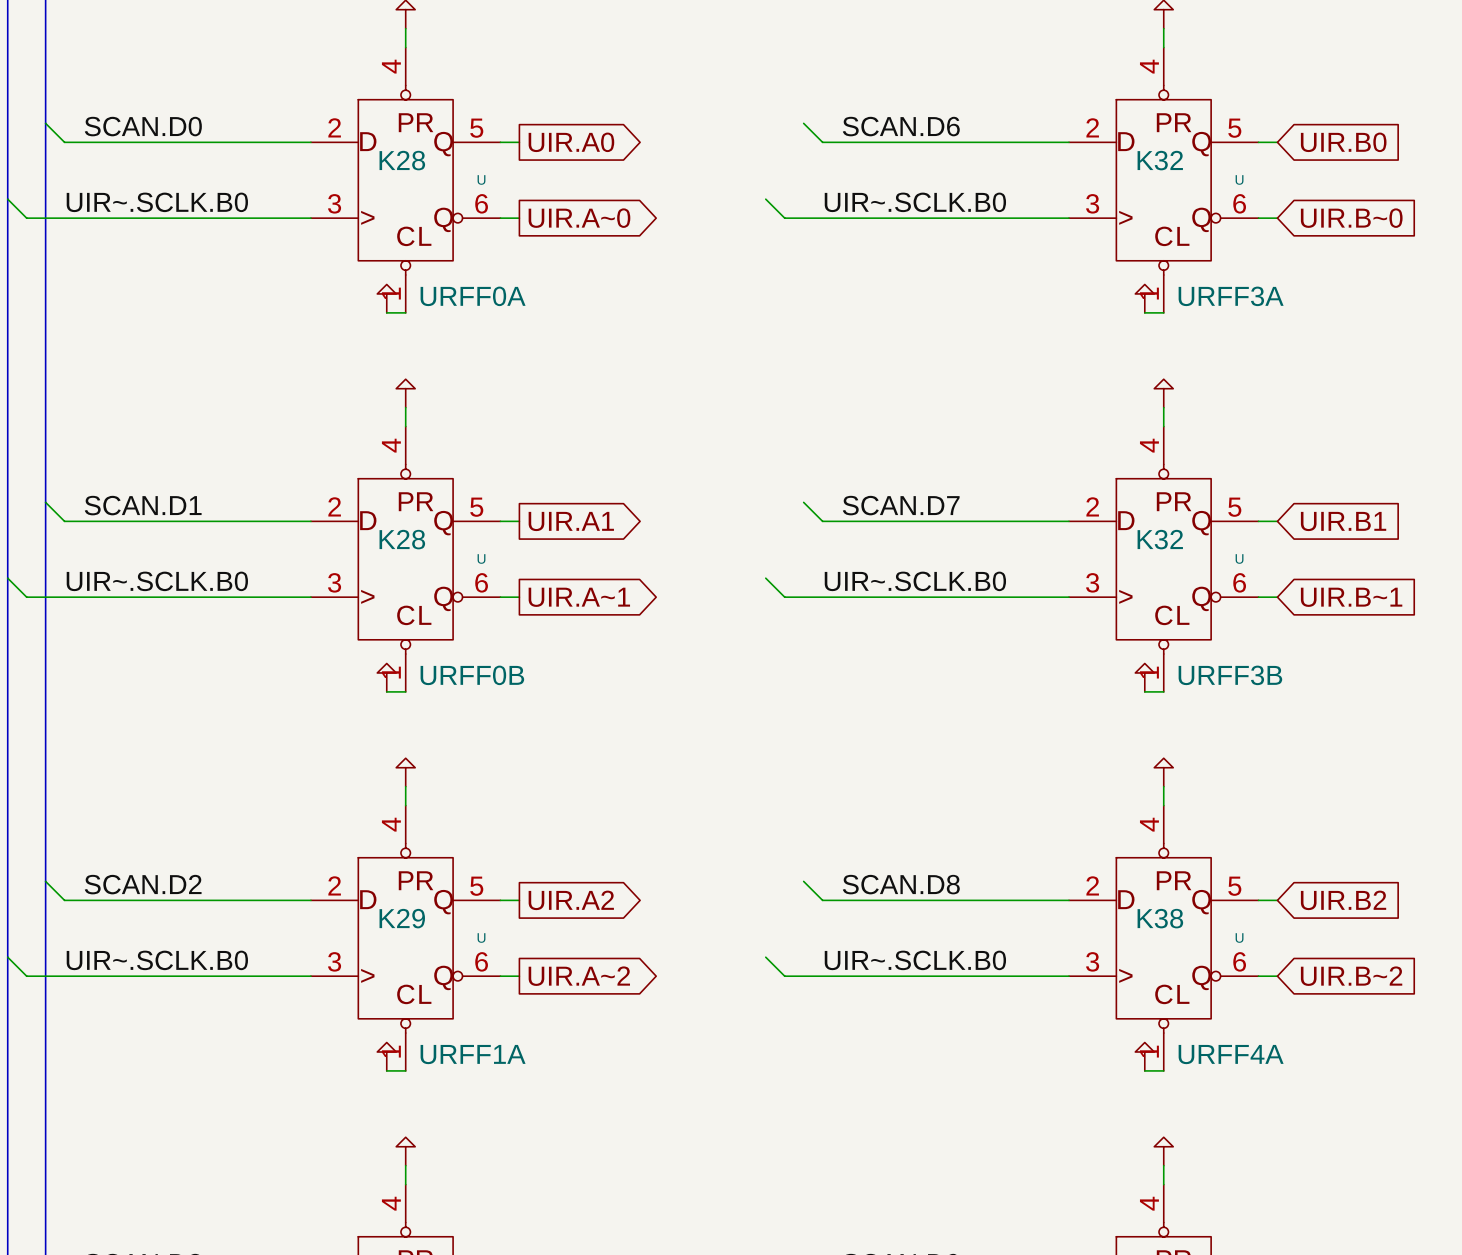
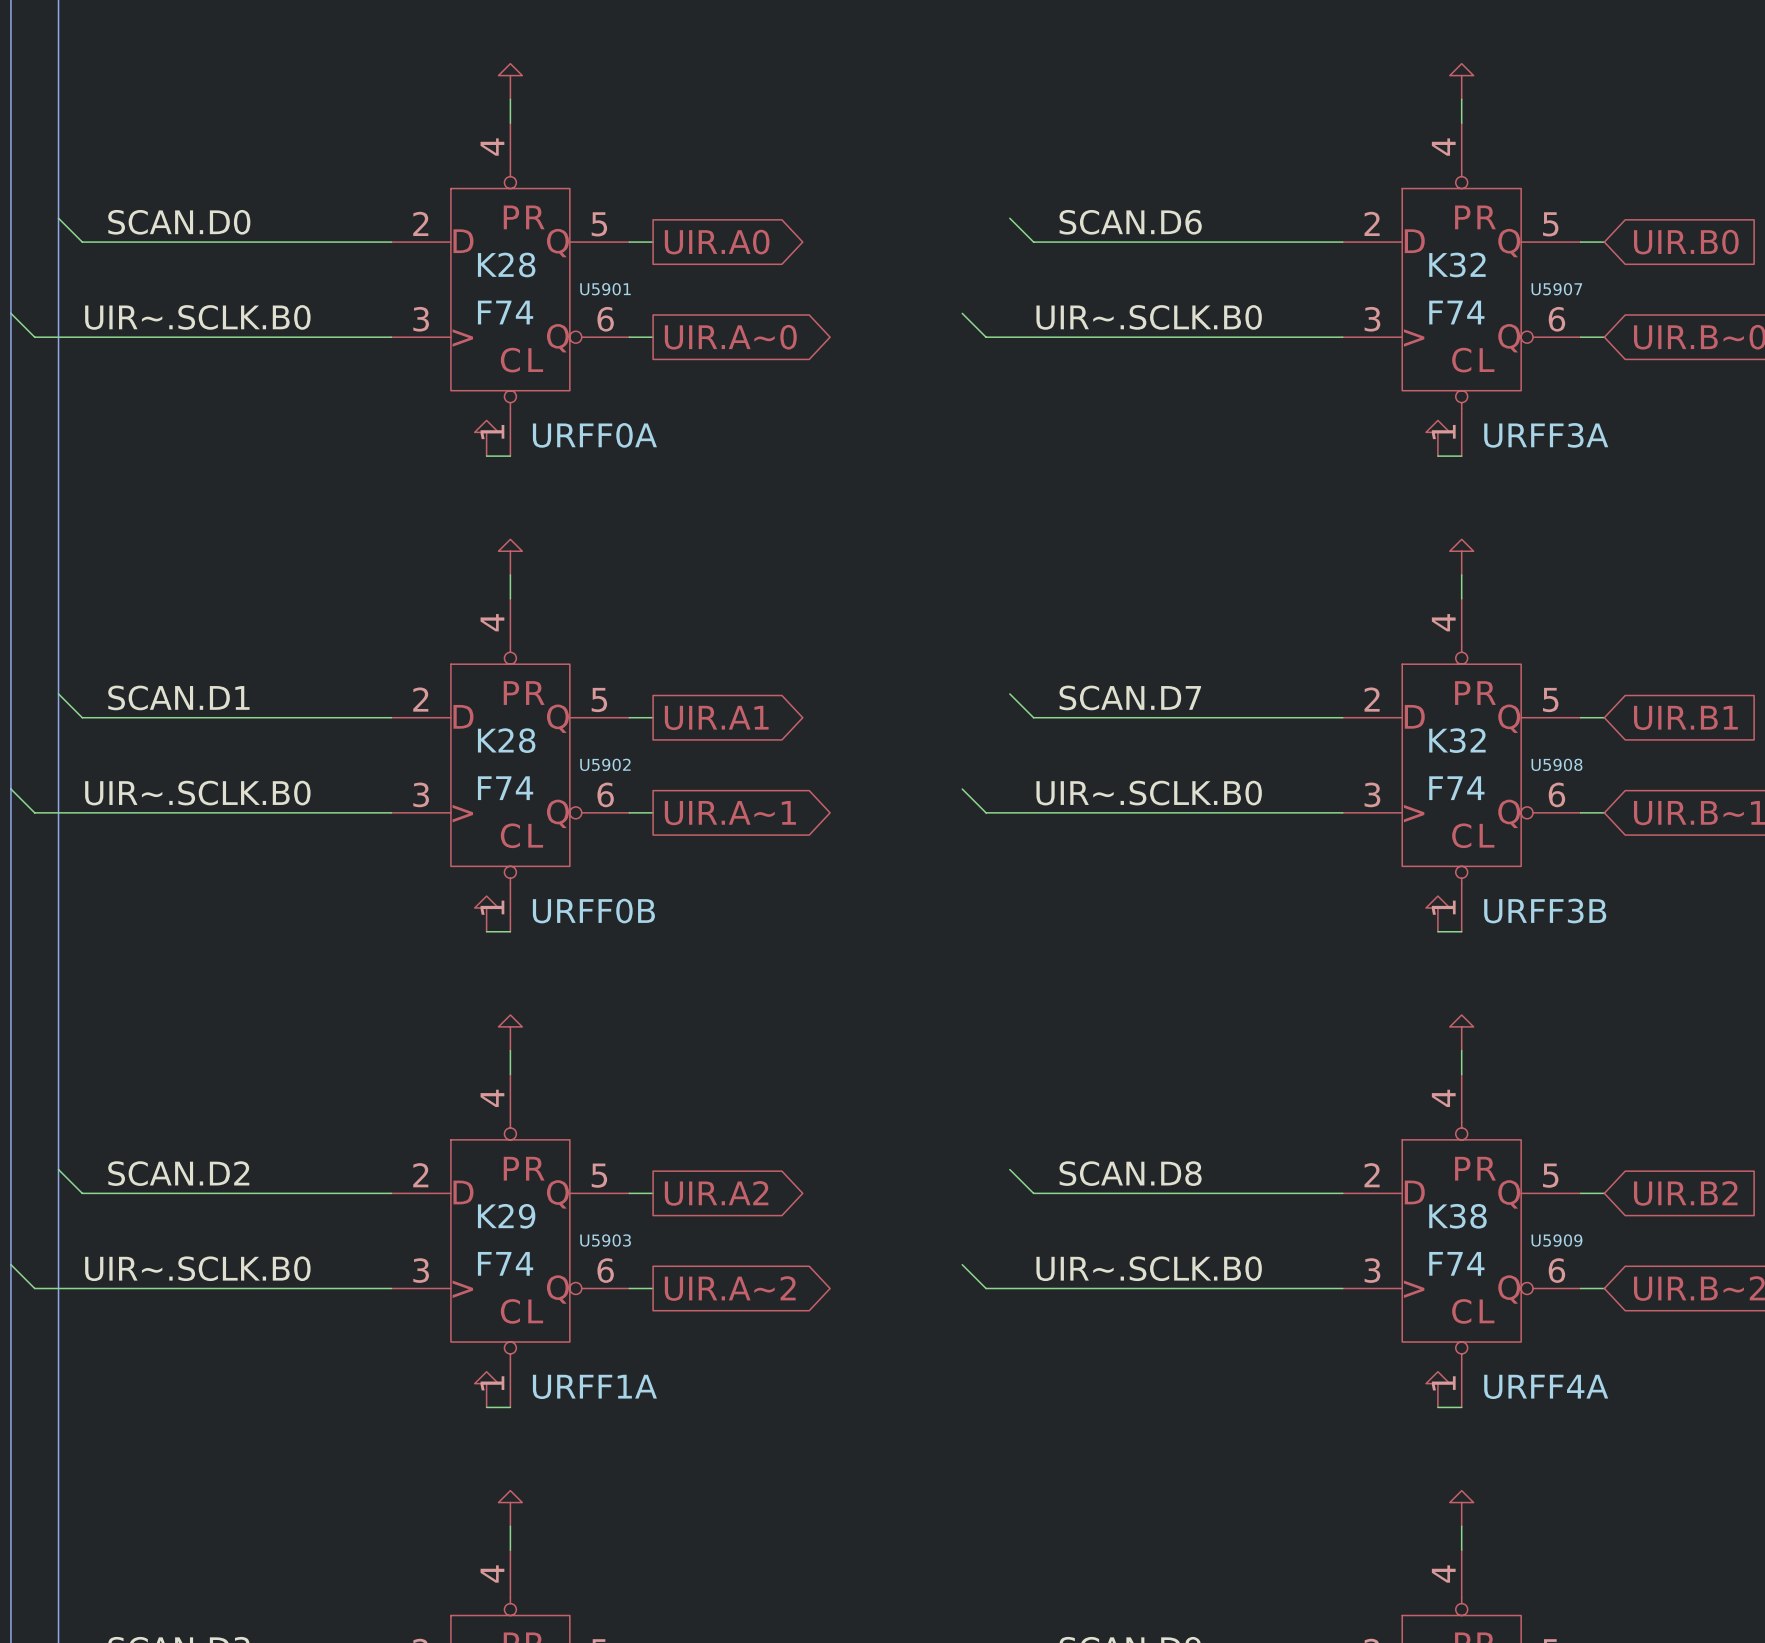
U name: U (481, 179) -> U5901 (605, 289)
U name: U (1239, 179) -> U5907 (1556, 289)
U value: none -> F74 (505, 312)
U value: none -> F74 (1456, 312)
U name: U (481, 558) -> U5902 (605, 764)
U name: U (1239, 558) -> U5908 (1556, 764)
U value: none -> F74 (505, 788)
U value: none -> F74 (1456, 788)
U name: U (481, 938) -> U5903 (605, 1240)
U name: U (1239, 938) -> U5909 (1556, 1240)
U value: none -> F74 (505, 1263)
U value: none -> F74 (1456, 1263)

